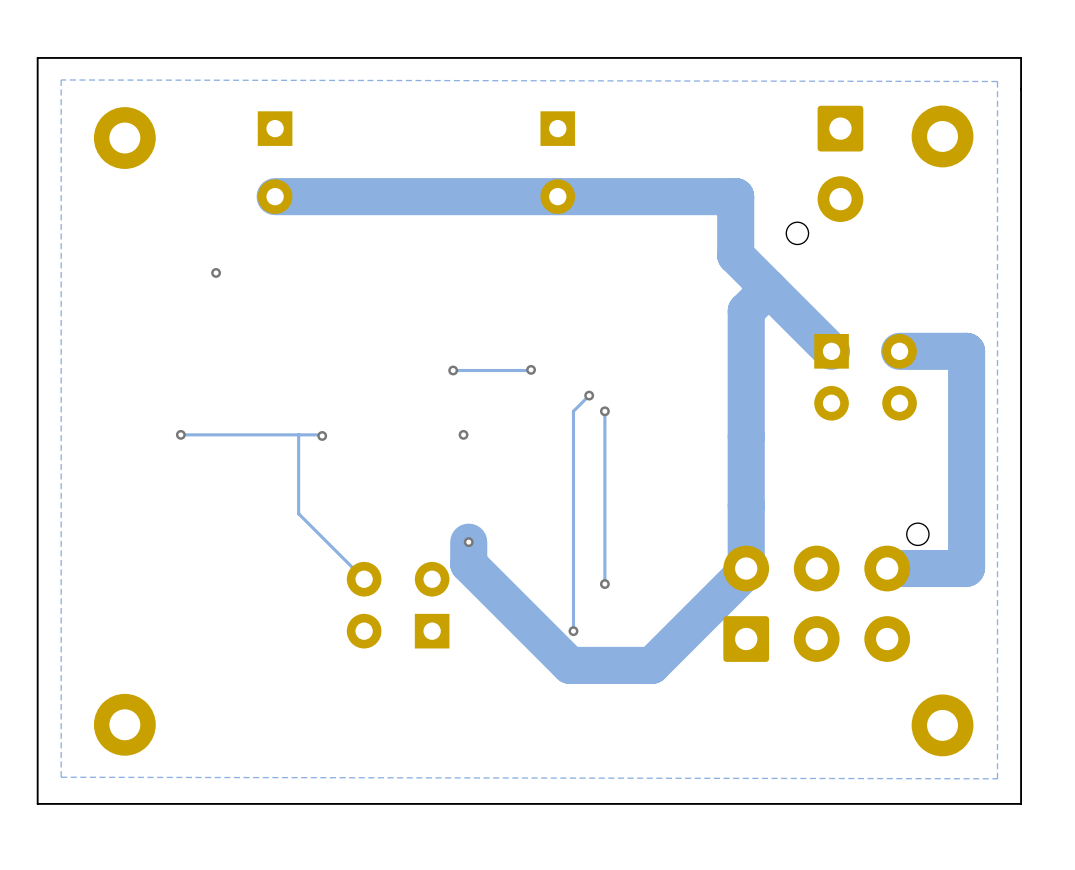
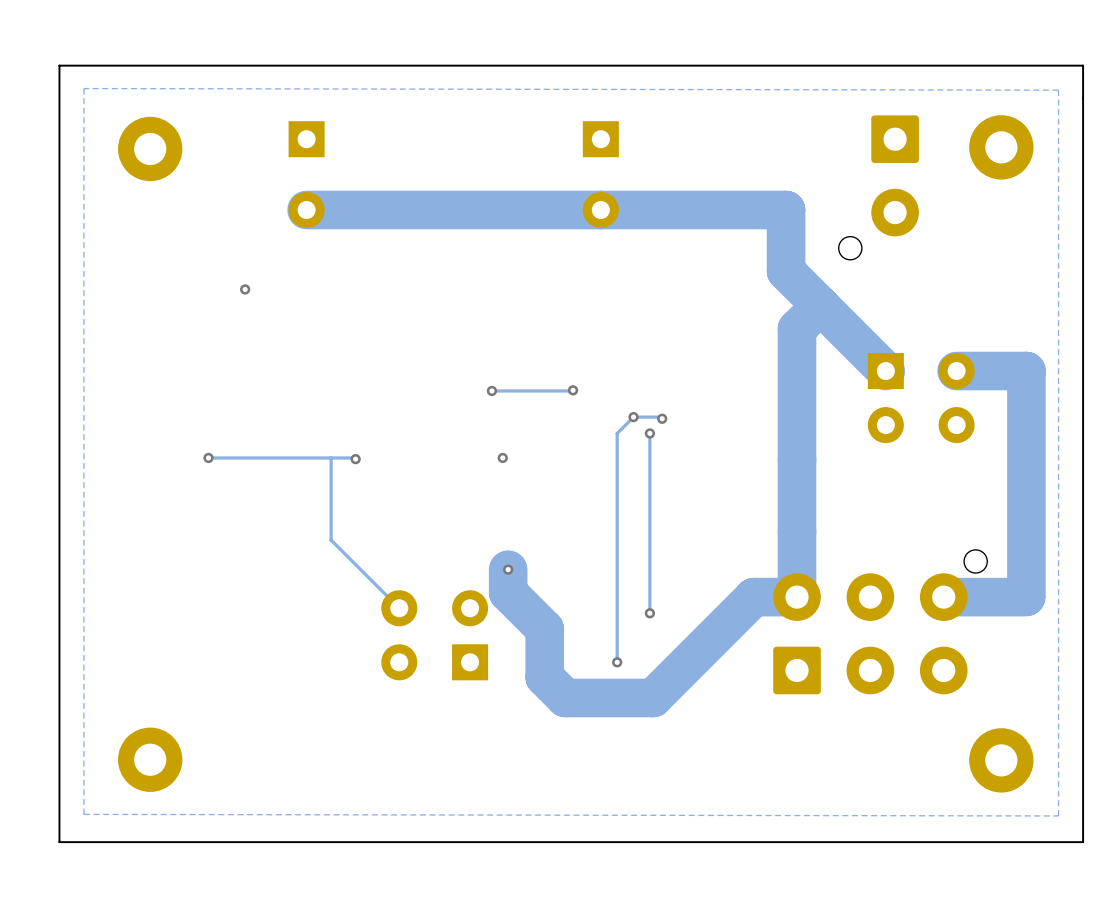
track: none -> (633, 417) (660, 417) (662, 418)
via: none -> (662, 418)
track: (746, 571) (651, 665) (607, 665) -> (797, 597) (753, 597) (653, 697)
track: (503, 599) (570, 665) -> (544, 629) (544, 677) (565, 697) (613, 697)

